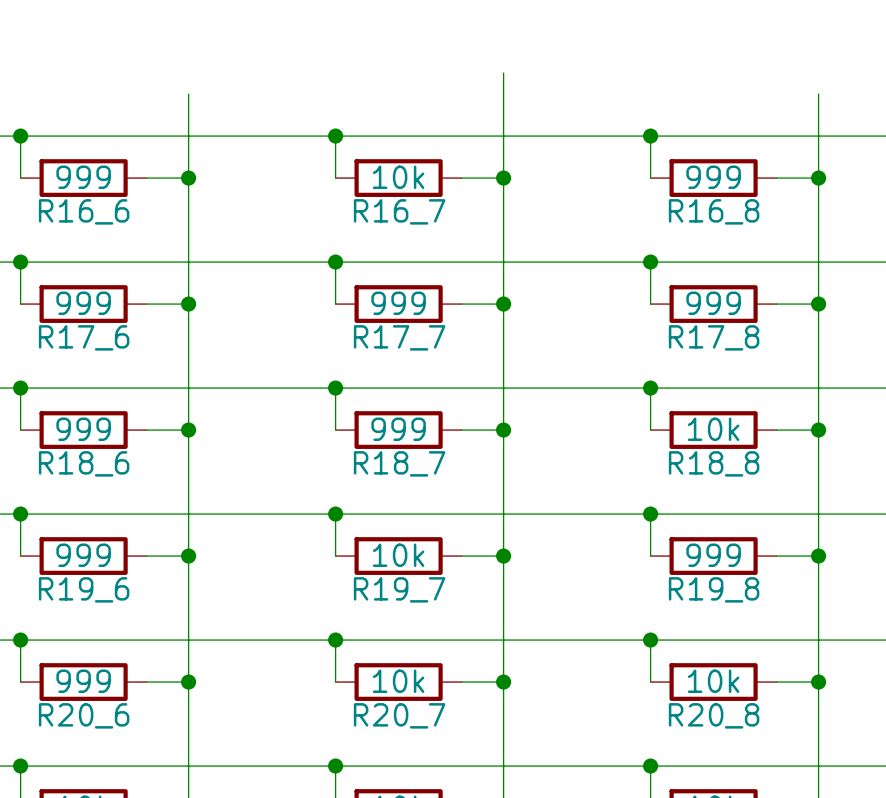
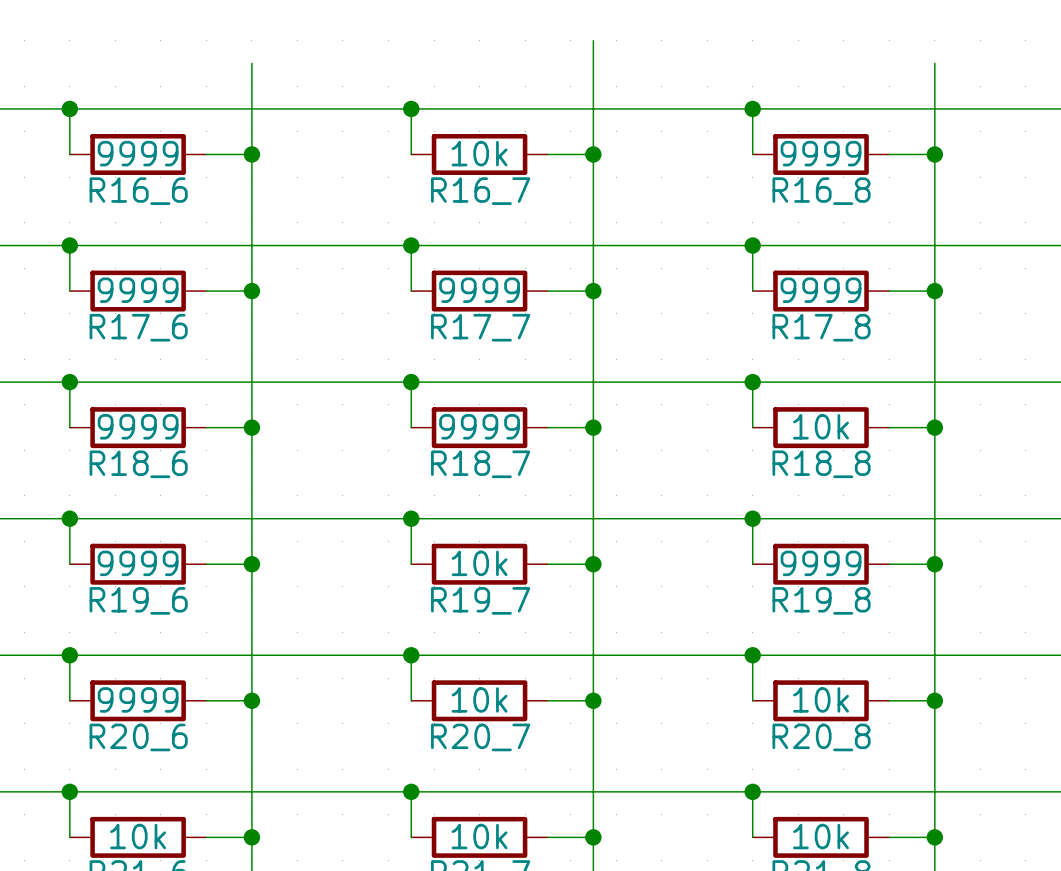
R16_6 value: 999 (83, 177) -> 9999 (138, 153)
R16_8 value: 999 (713, 177) -> 9999 (821, 153)
R17_6 value: 999 (83, 303) -> 9999 (138, 290)
R17_7 value: 999 (398, 303) -> 9999 (479, 290)
R17_8 value: 999 (713, 303) -> 9999 (821, 290)
R18_6 value: 999 (83, 429) -> 9999 (138, 426)
R18_7 value: 999 (398, 429) -> 9999 (479, 426)
R19_6 value: 999 (83, 555) -> 9999 (138, 563)
R19_8 value: 999 (713, 555) -> 9999 (821, 563)
R20_6 value: 999 (83, 681) -> 9999 (138, 699)

